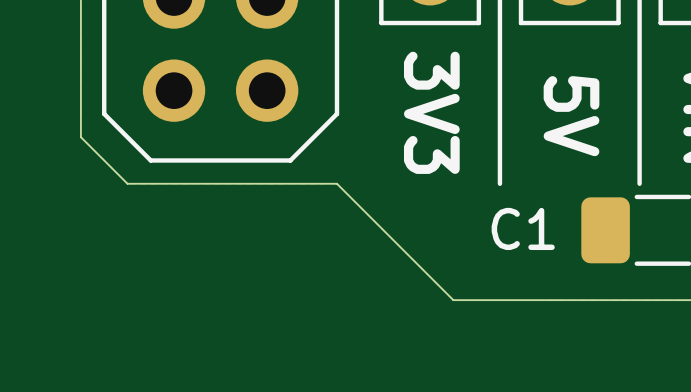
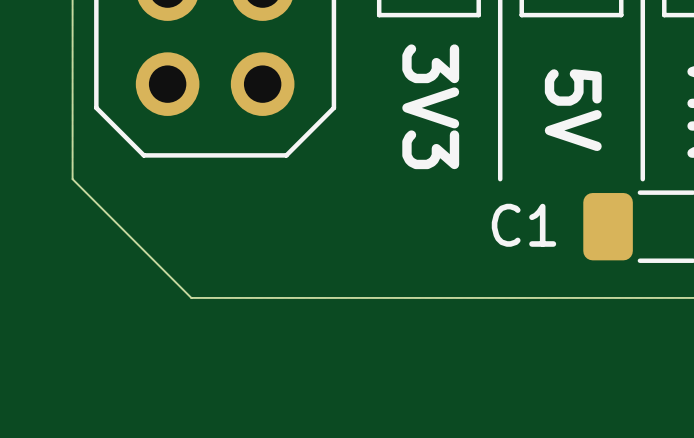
board edge: (80, 137) (127, 183) (336, 183) (453, 300) -> (72, 131) (72, 179) (191, 297) (452, 297)

